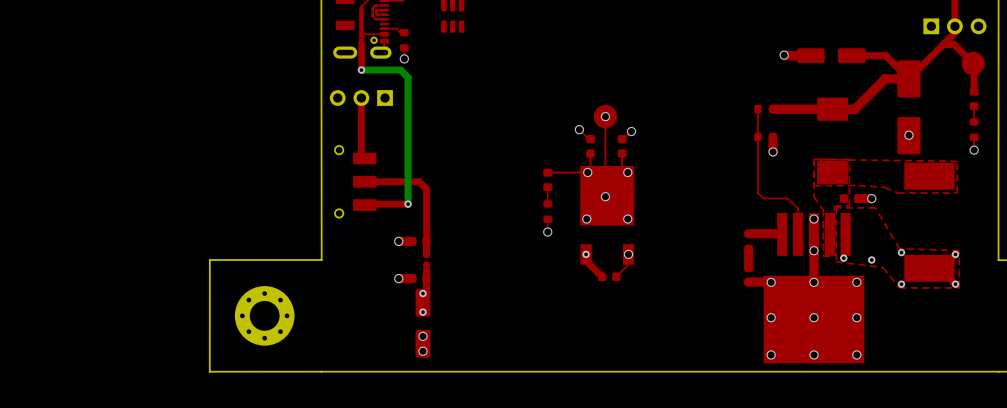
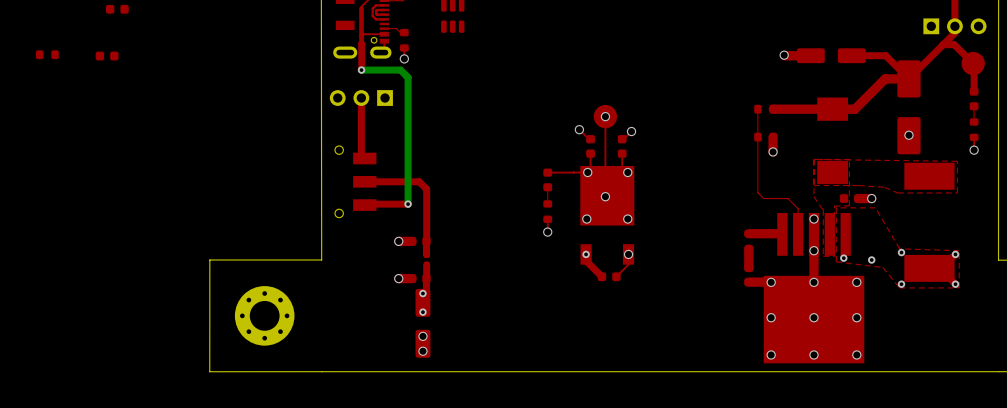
part: none -> (117, 9)
part: none -> (47, 54)
part: none -> (107, 56)

